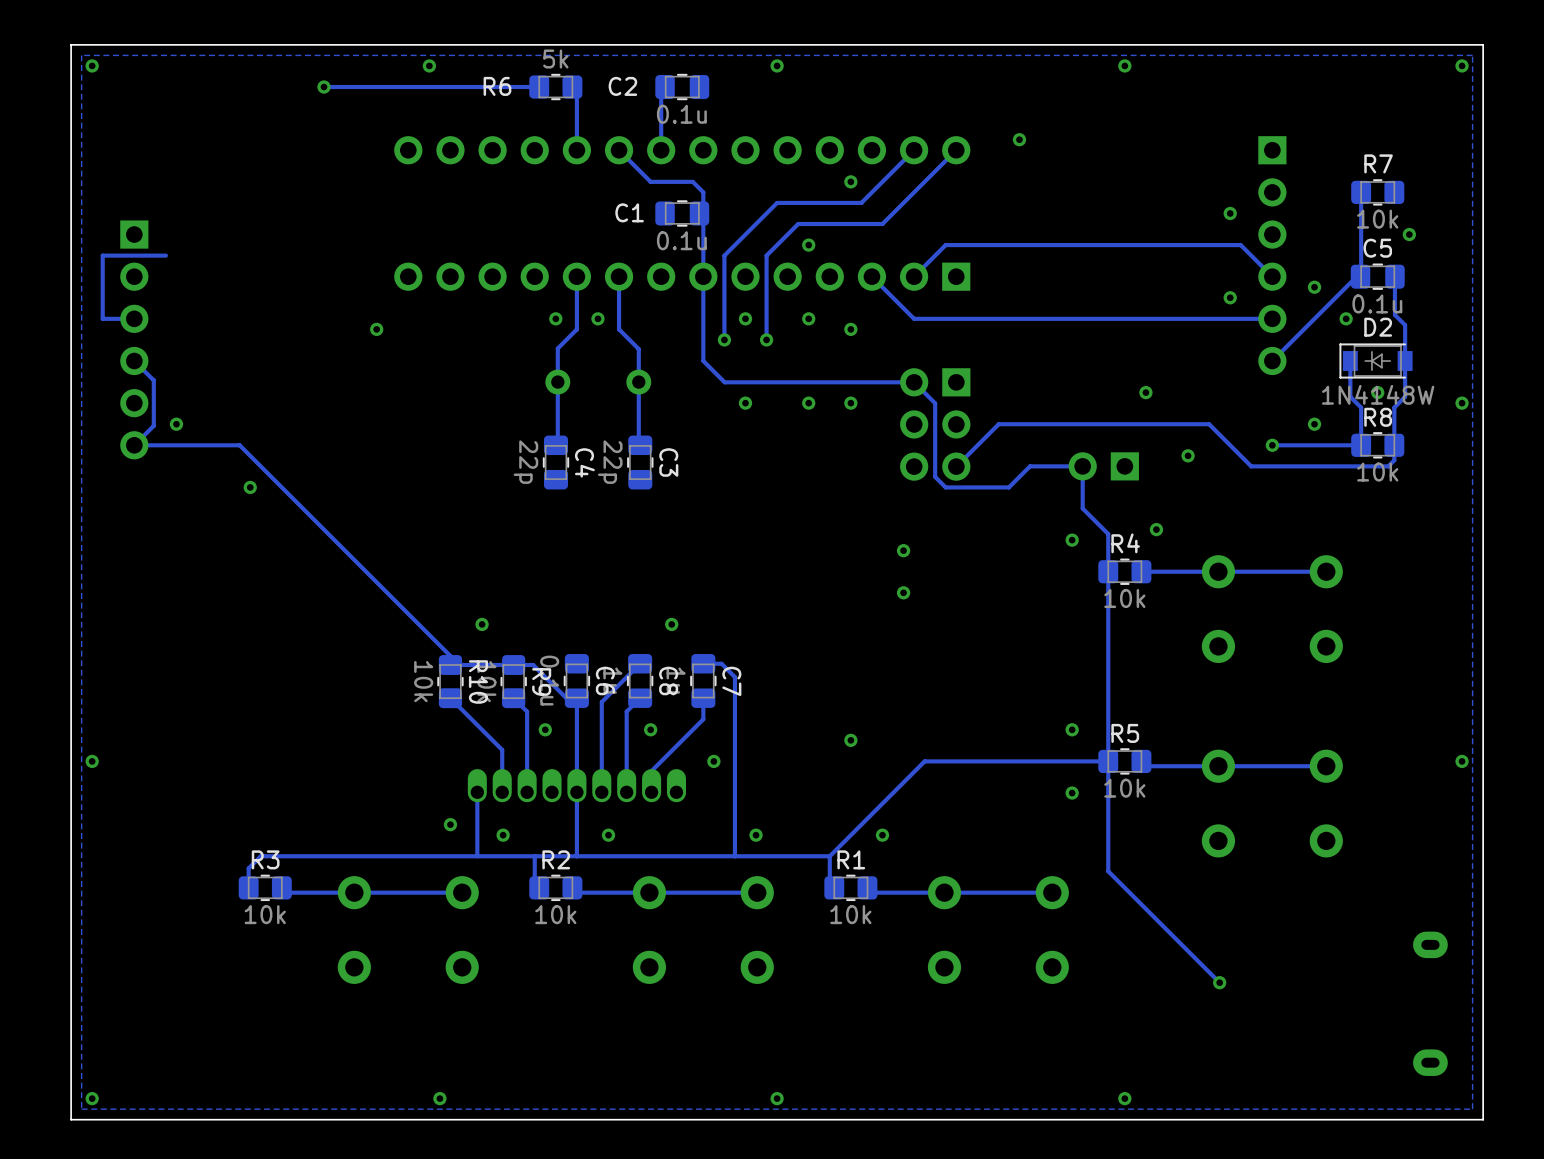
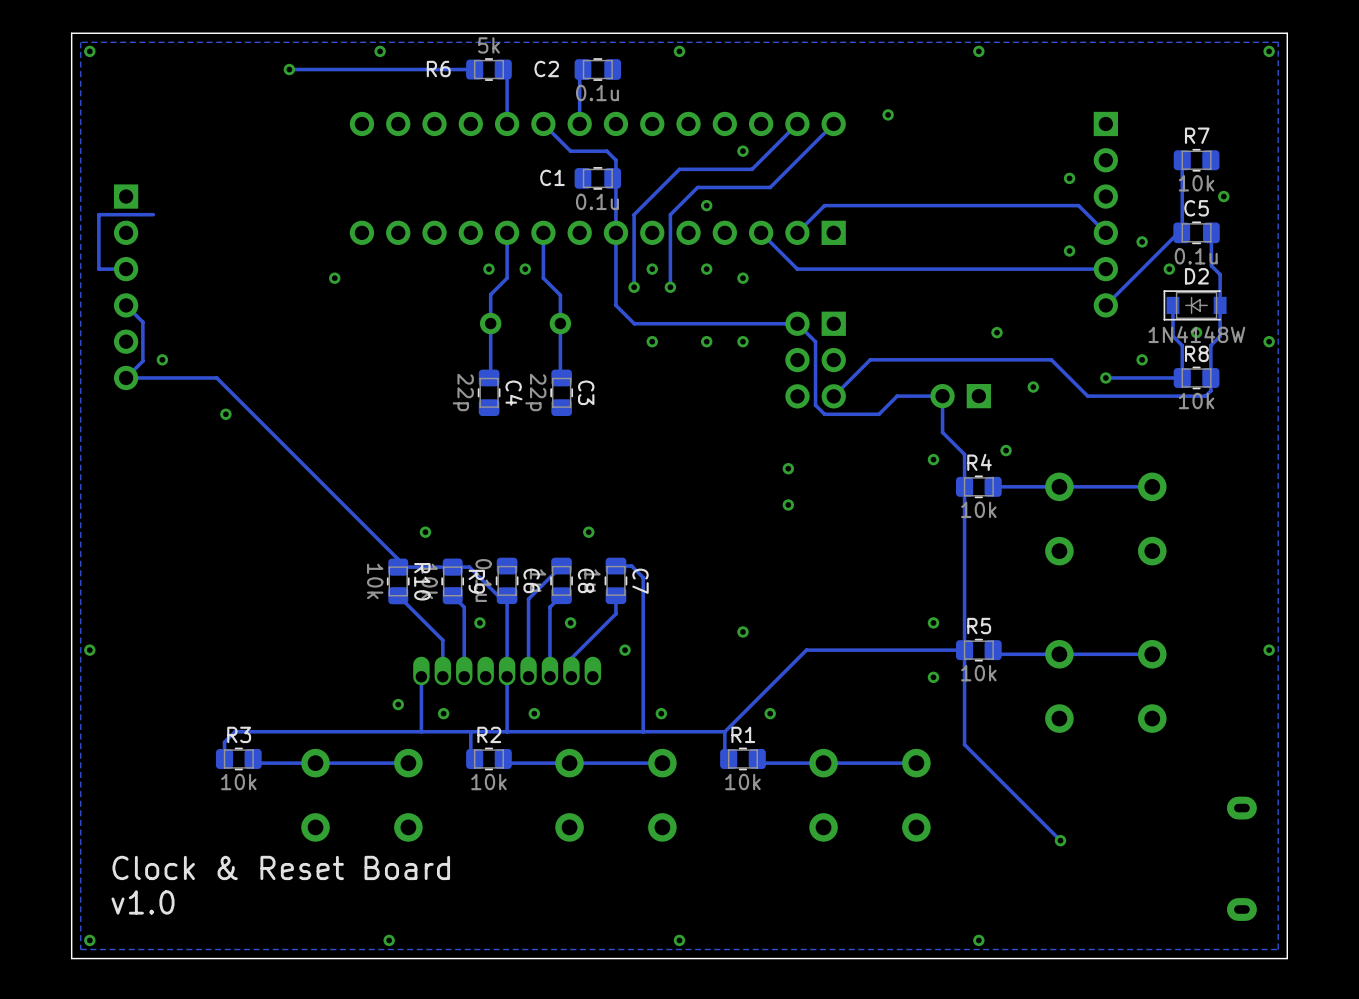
text: none -> Clock & Reset Board (281, 867)
text: none -> v1.0 (142, 902)

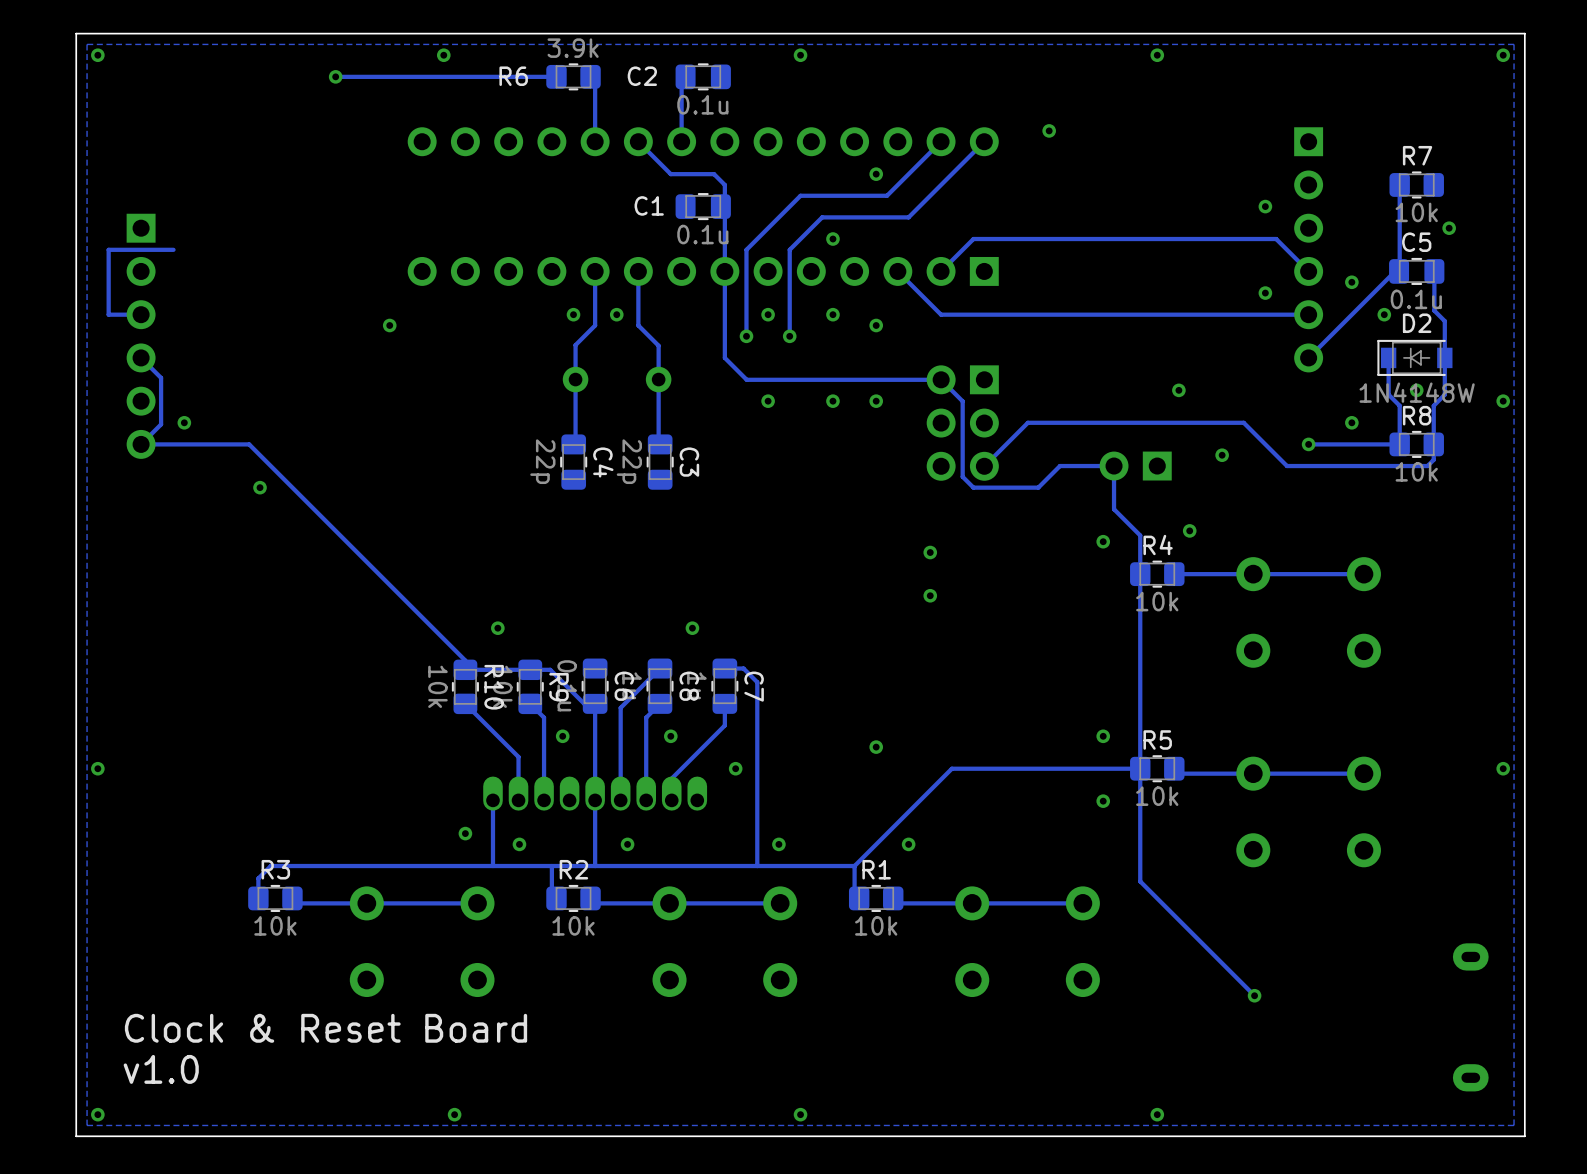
R6 value: 5k (488, 45) -> 3.9k (573, 48)

